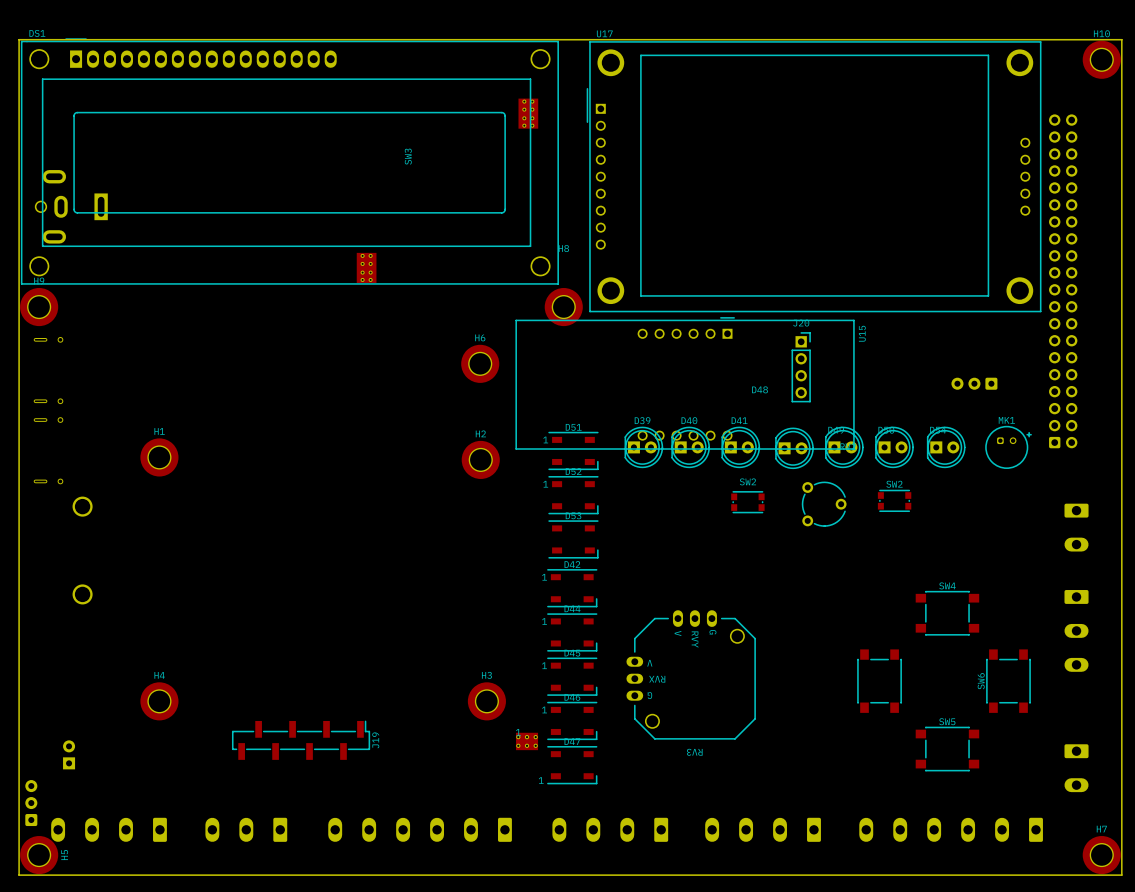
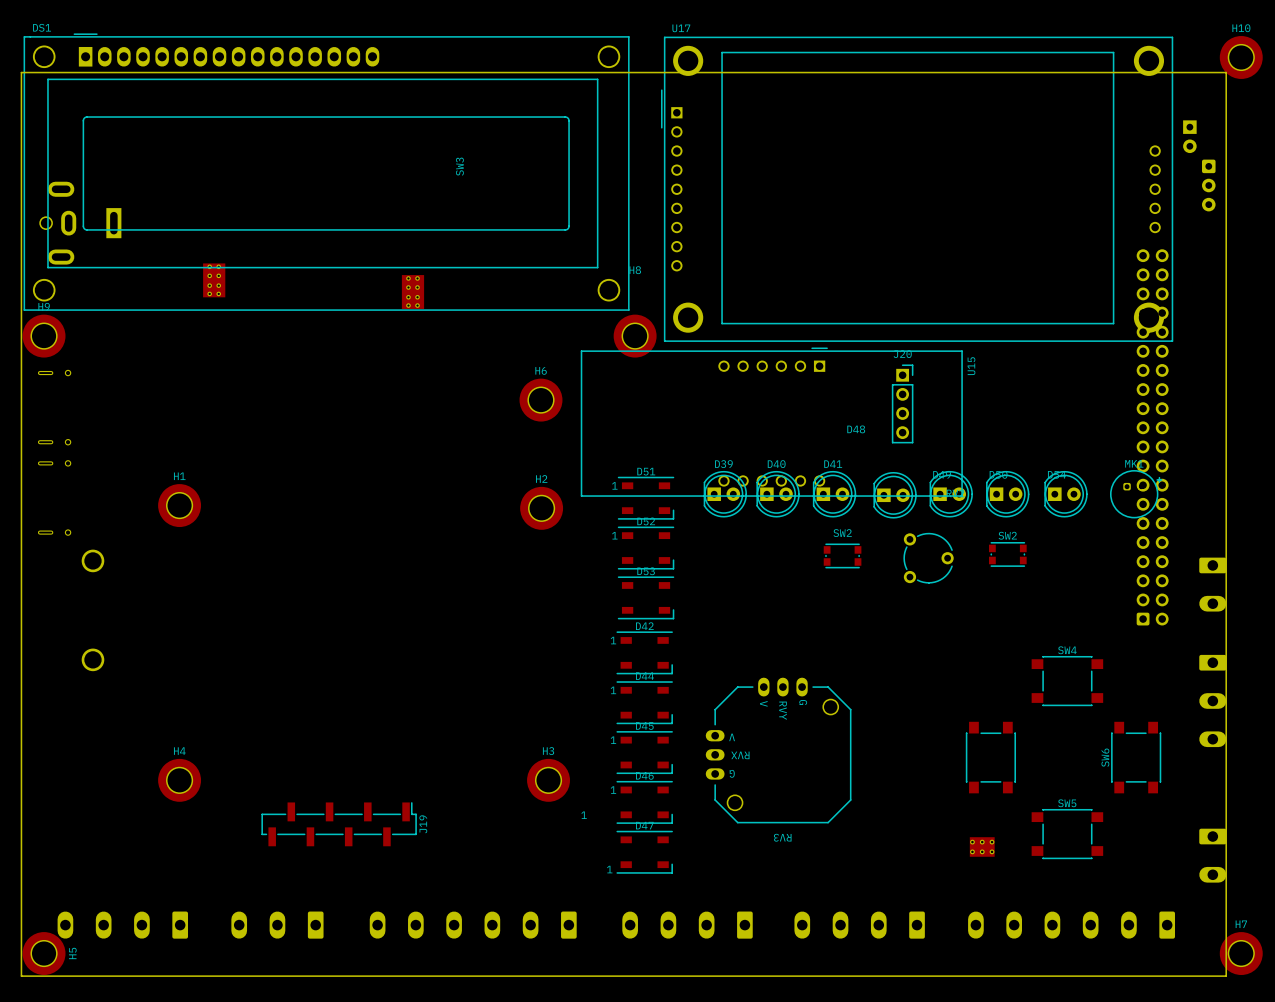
board edge: (19, 73) (19, 39) (1121, 39) (1121, 875) (1088, 875) -> (21, 72) (1226, 72) (1226, 976)
part: (528, 113) -> none
part: none -> (1189, 136)
part: none -> (1208, 185)
part: none -> (214, 280)
part position: (1063, 281) -> (1152, 437)
part: (974, 383) -> none
part: (527, 741) -> none
part: (69, 754) -> none
part: none -> (982, 846)
part: (31, 803) -> none

